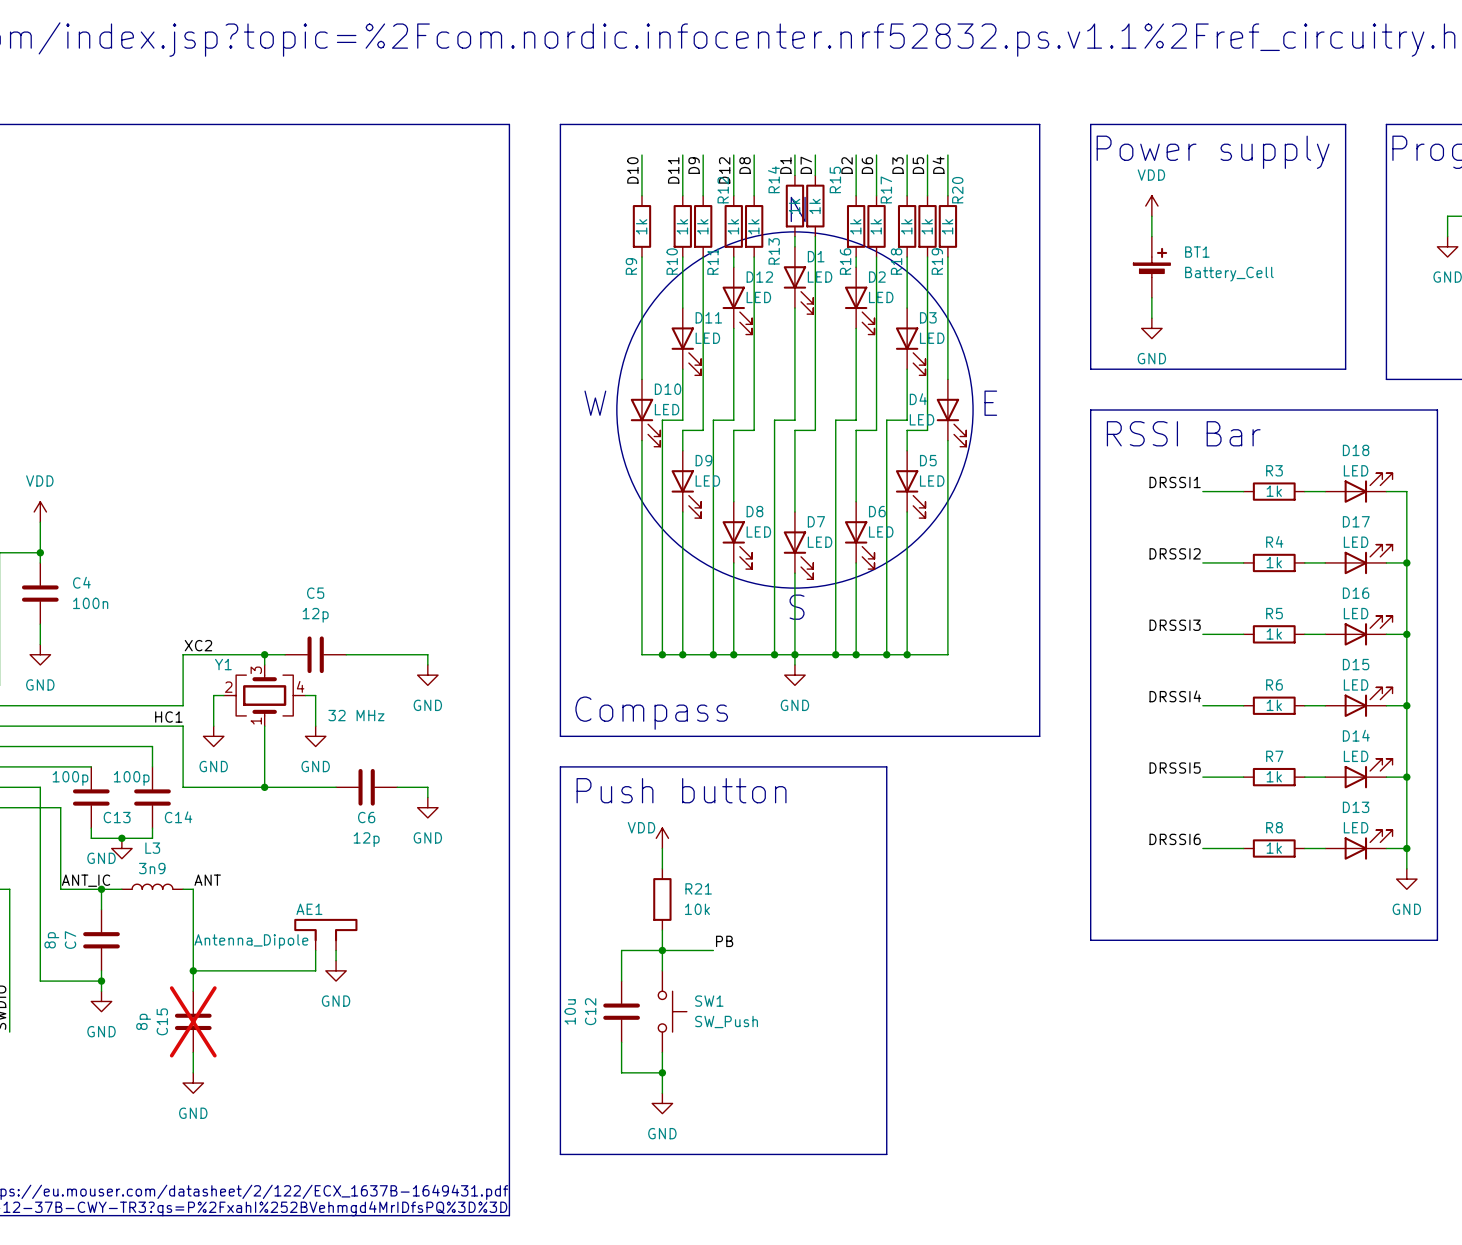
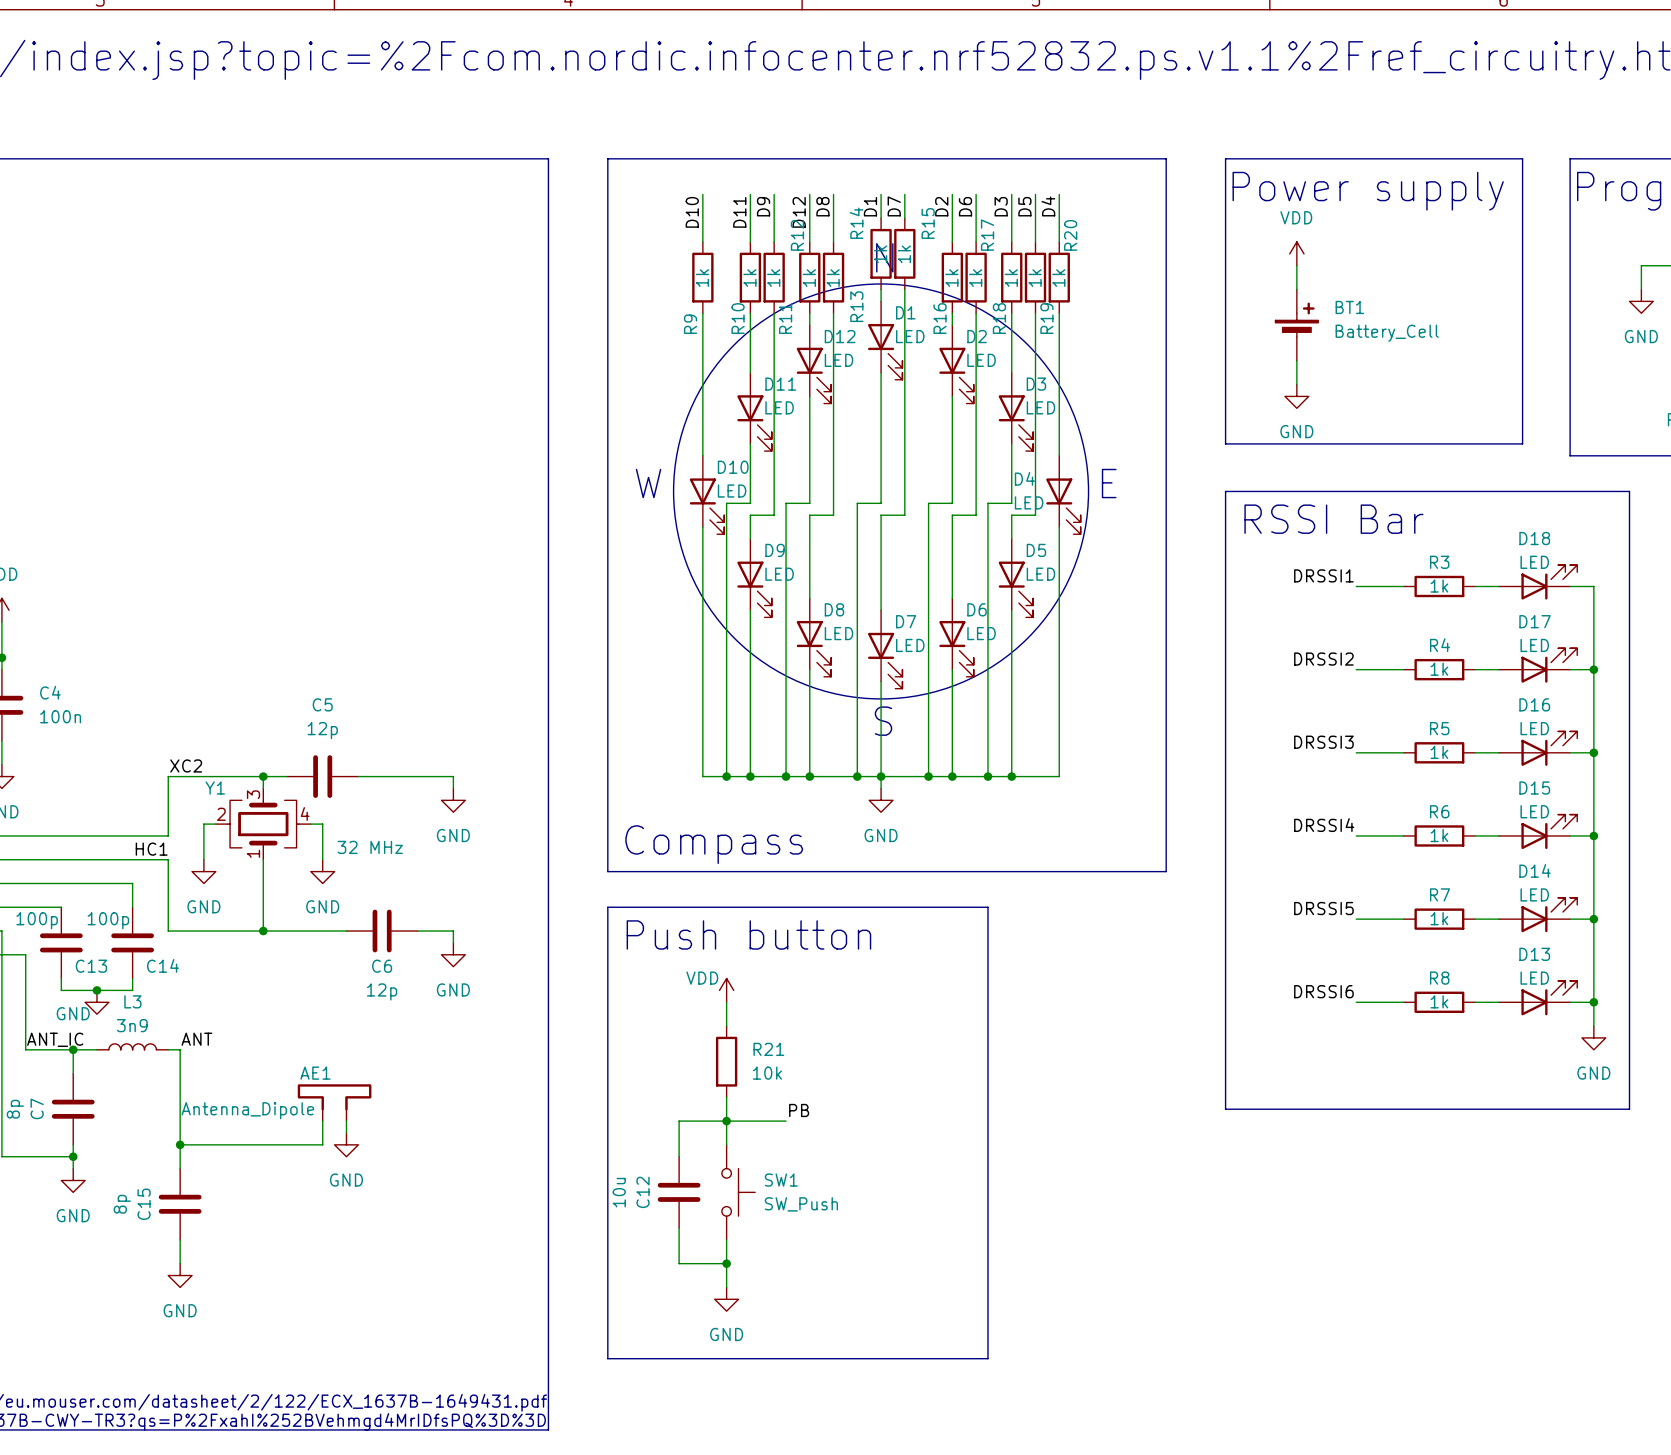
C15 do-not-place cross: (193, 1021) -> none

